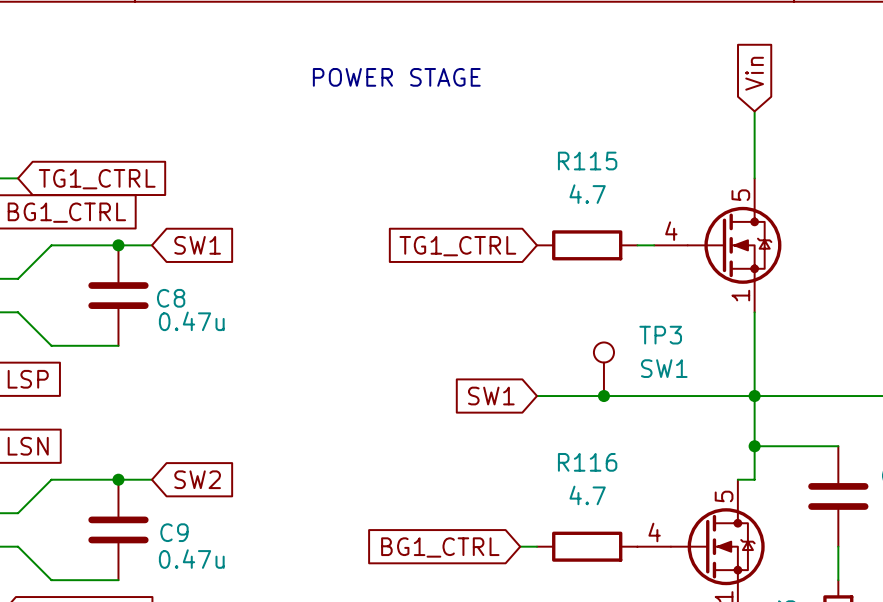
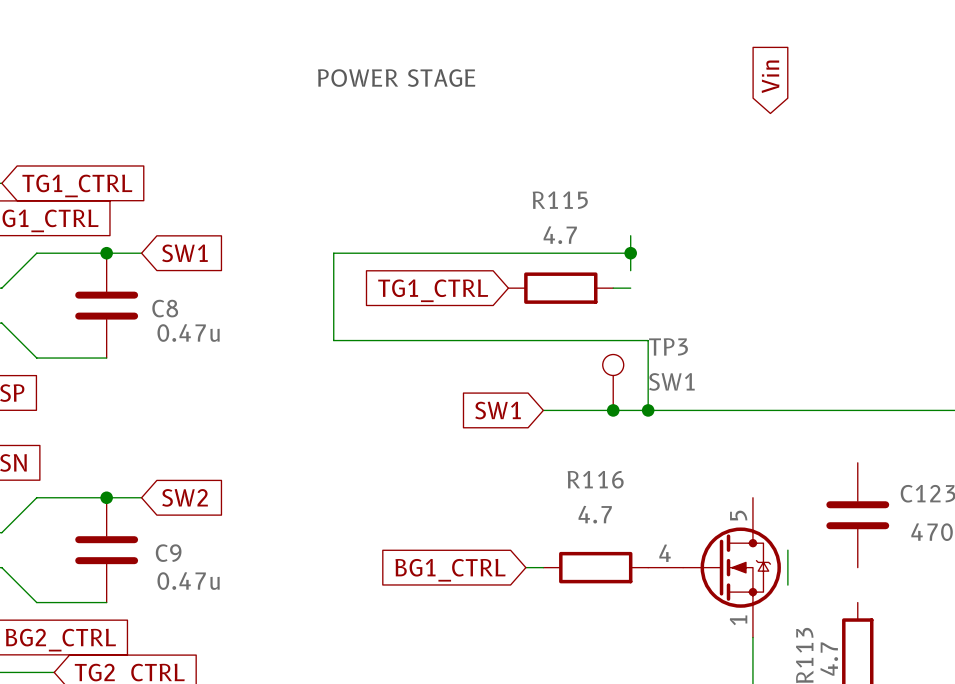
wire: (754, 111) (754, 178) -> none
R115 position: (587, 245) -> (560, 288)
wire: none -> (630, 253) (333, 253) (333, 340) (648, 340) (648, 410)
junction: none -> (630, 253)
wire: (637, 245) (654, 245) -> (613, 288) (630, 288)
part: (717, 245) -> none
global label position: TG1_CTRL (457, 246) -> TG1_CTRL (433, 290)
wire: (754, 312) (754, 479) (737, 479) -> none
junction: none -> (648, 410)
junction: (754, 396) -> none
wire: (754, 446) (838, 446) -> none
junction: (754, 446) -> none
wire: (838, 546) (838, 580) -> (787, 550) (787, 585)

